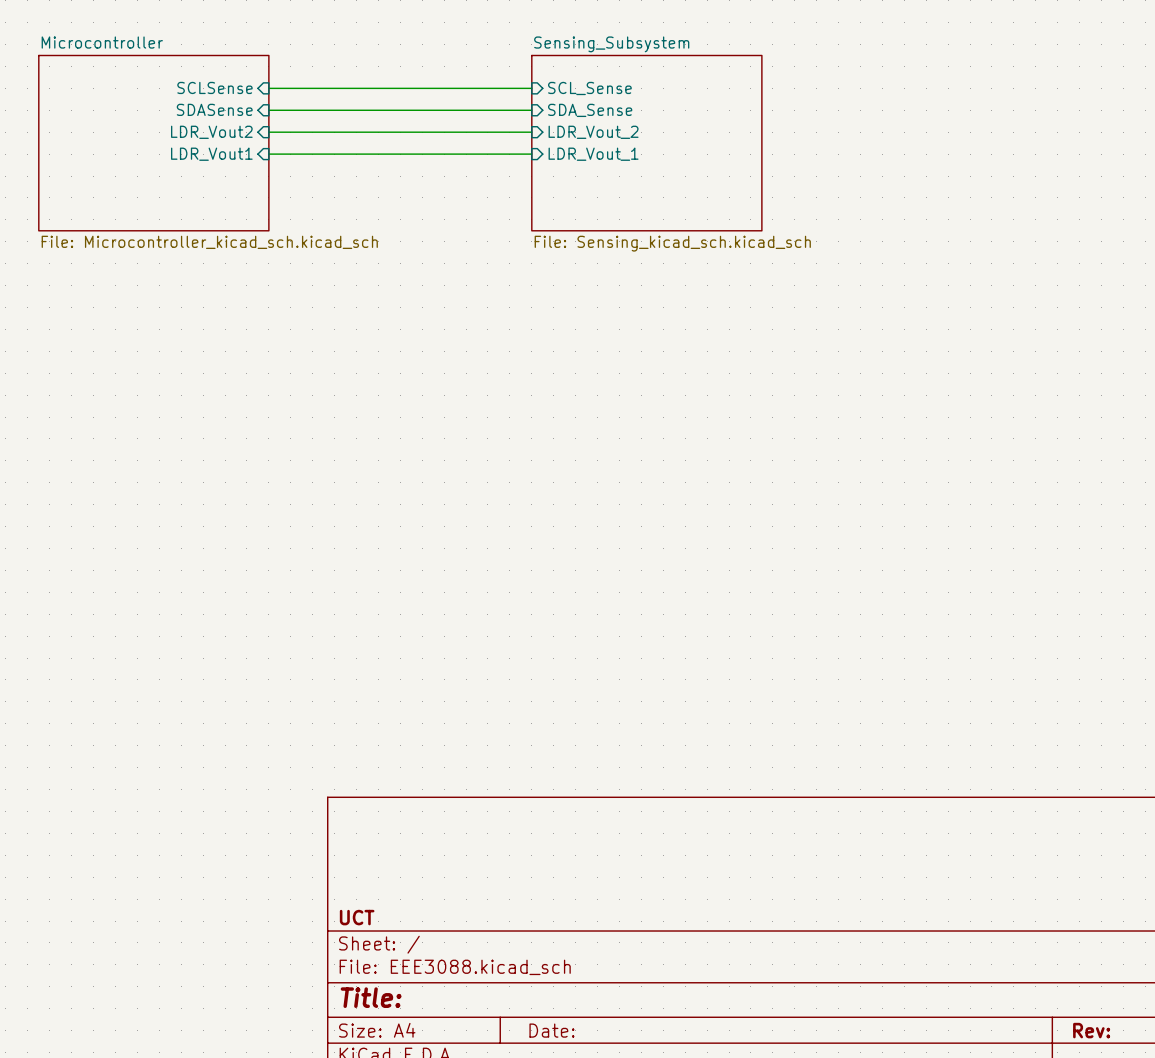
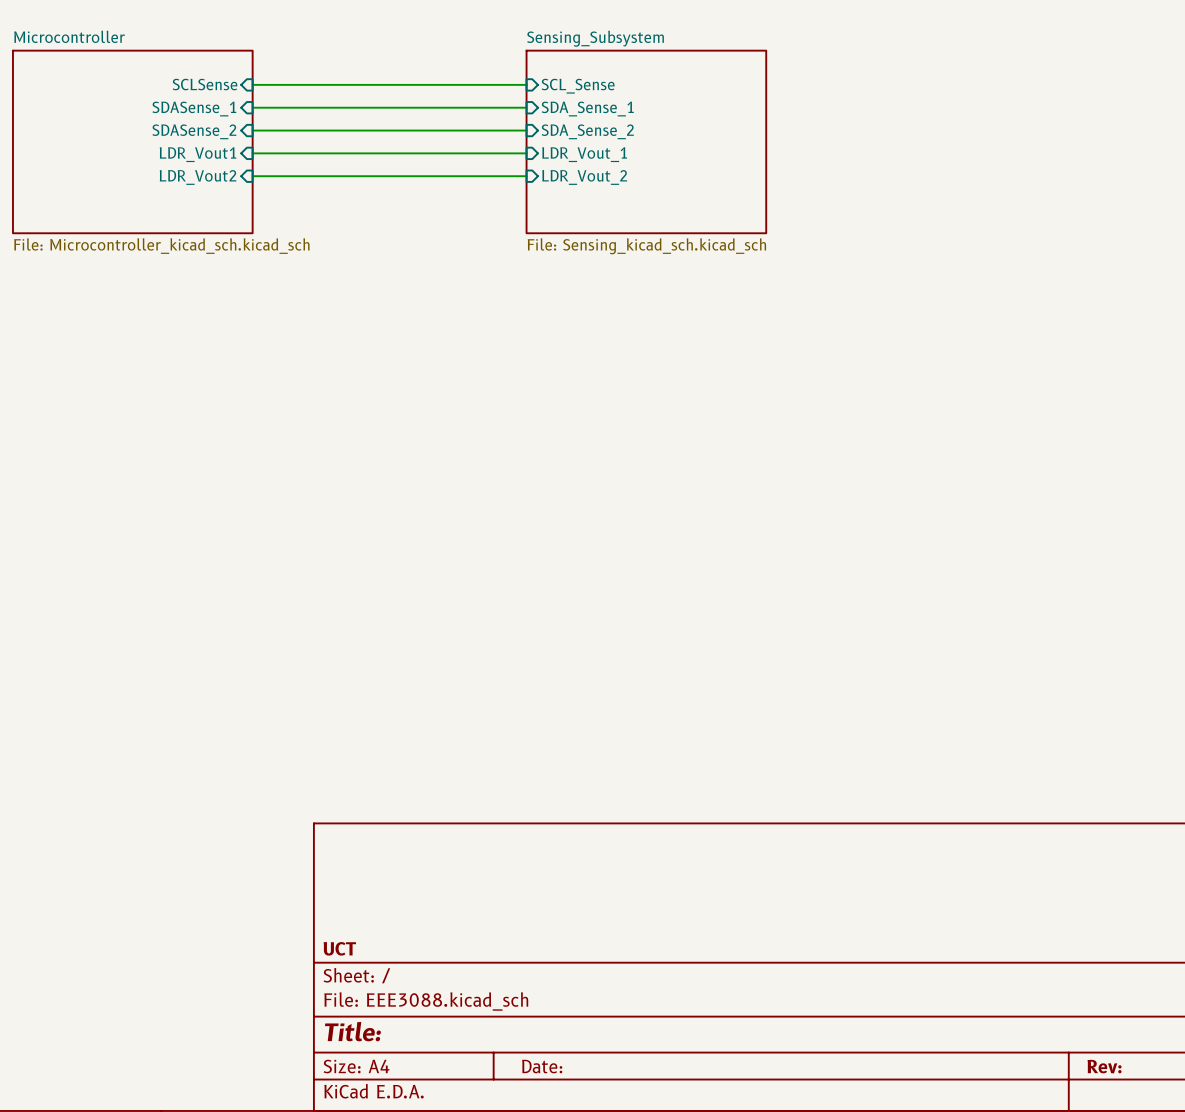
sheet pin: SDASense (214, 109) -> SDASense_1 (194, 109)
sheet pin: SDA_Sense (590, 110) -> SDA_Sense_1 (587, 109)
sheet pin: LDR_Vout2 (211, 132) -> SDASense_2 (194, 131)
sheet pin: LDR_Vout_2 (593, 132) -> SDA_Sense_2 (587, 131)
sheet pin: none -> LDR_Vout2 (198, 177)
wire: none -> (252, 176) (526, 176)
sheet pin: none -> LDR_Vout_2 (584, 177)

